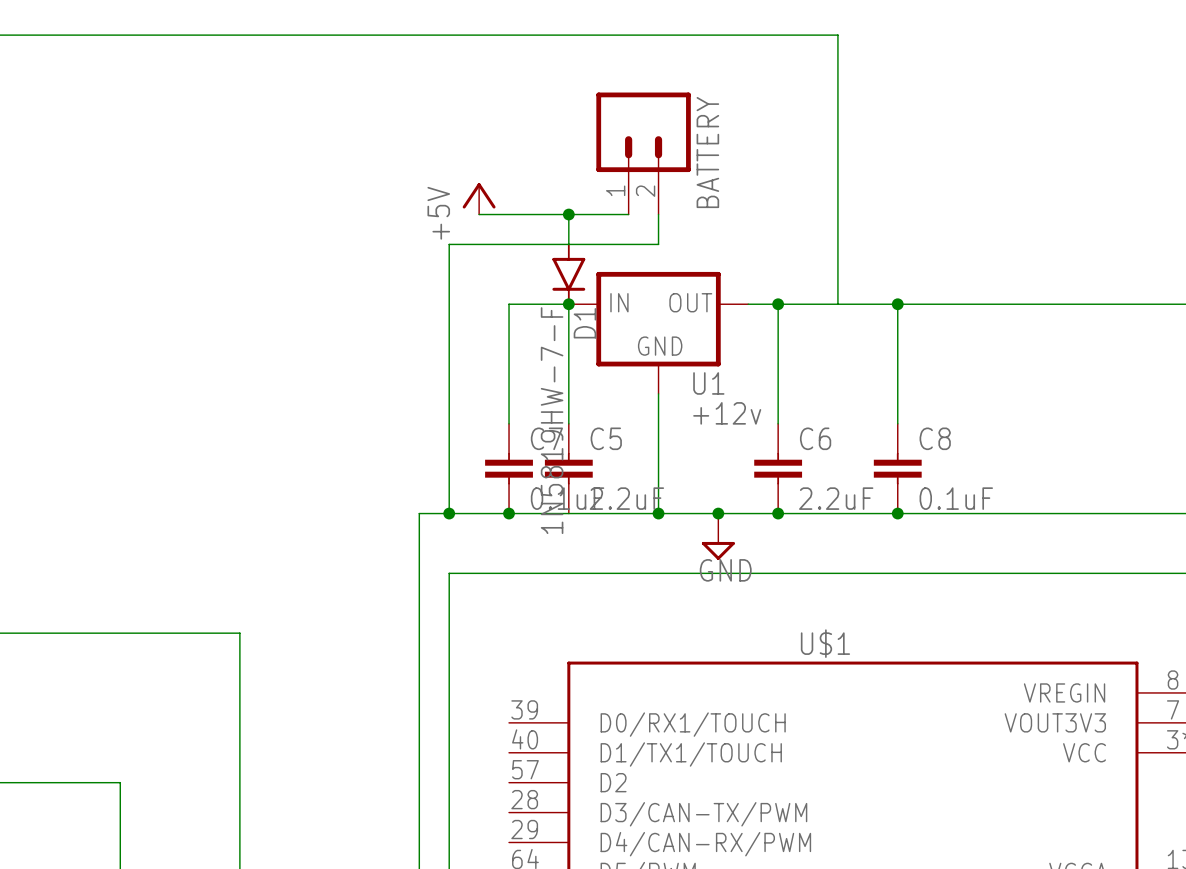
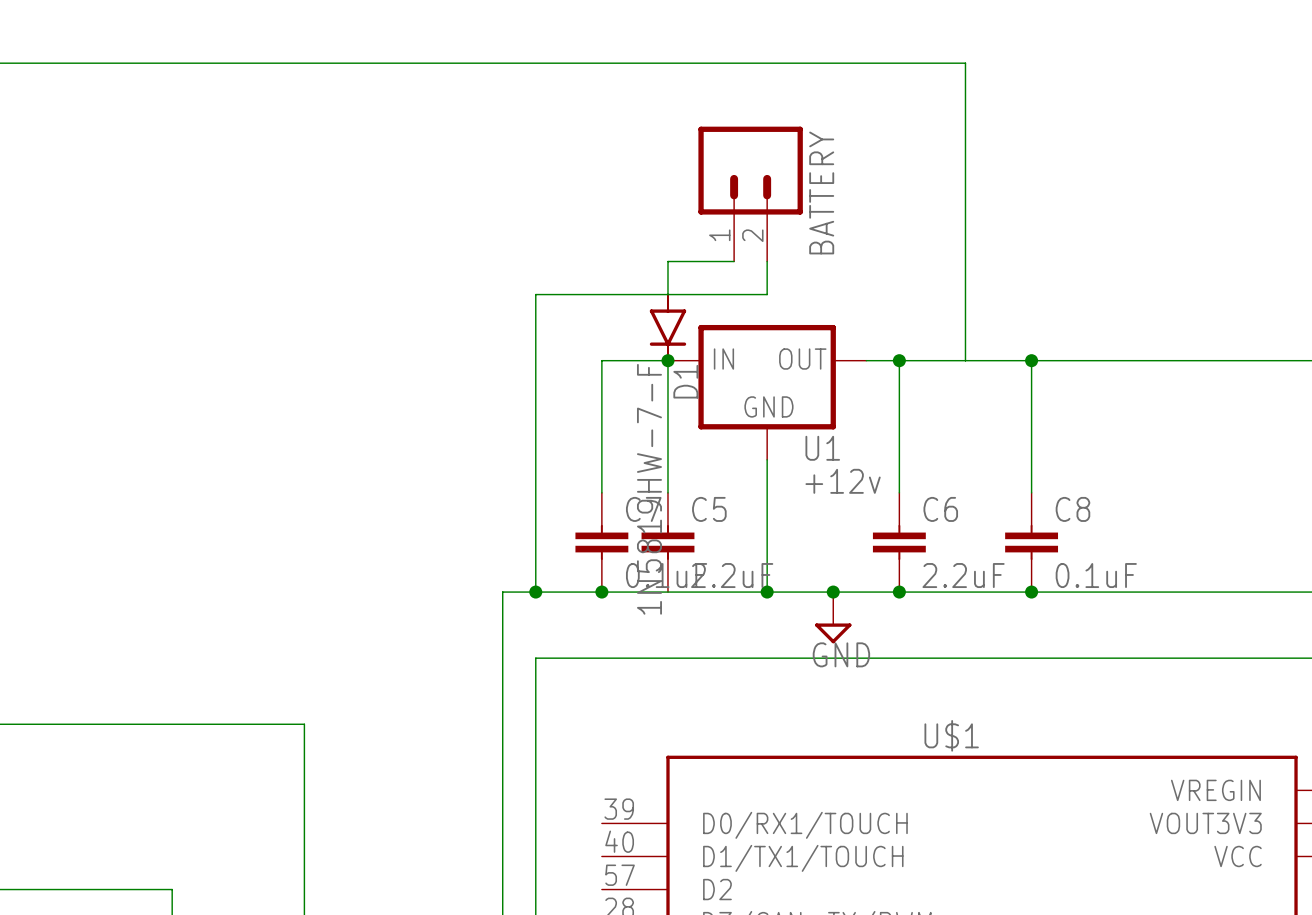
power symbol: +5V (479, 198) -> none
wire: (479, 214) (568, 214) -> none
junction: (568, 214) -> none

